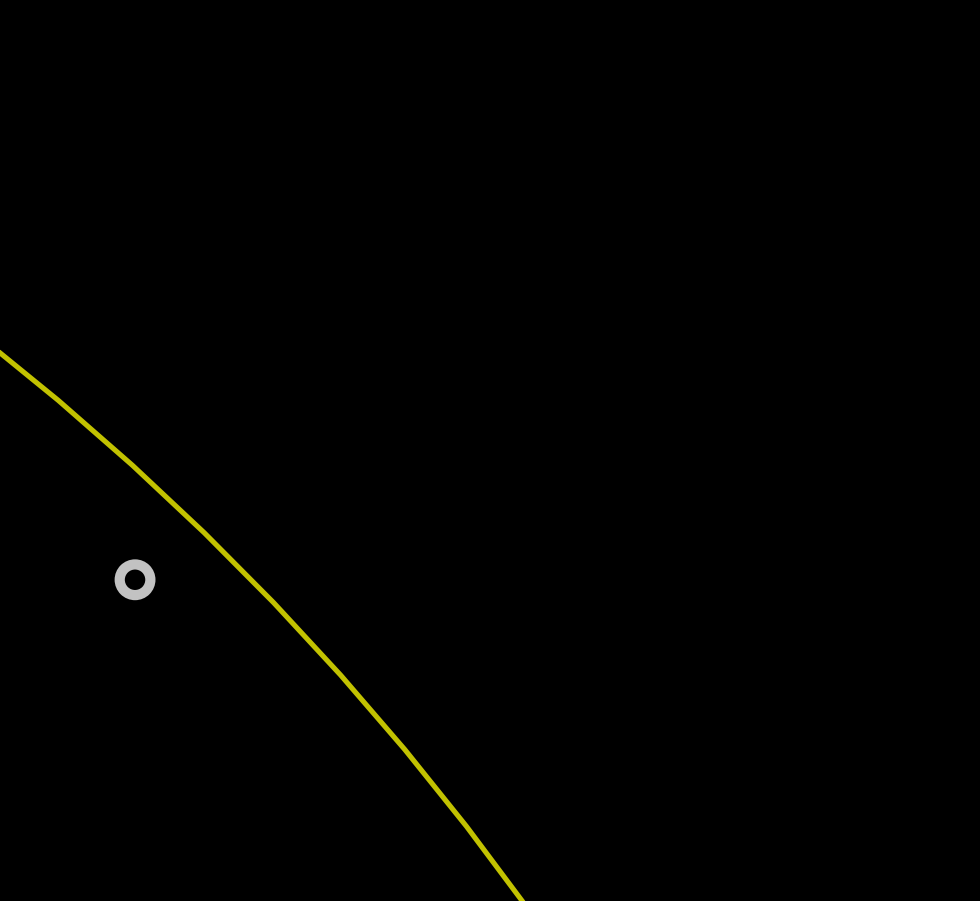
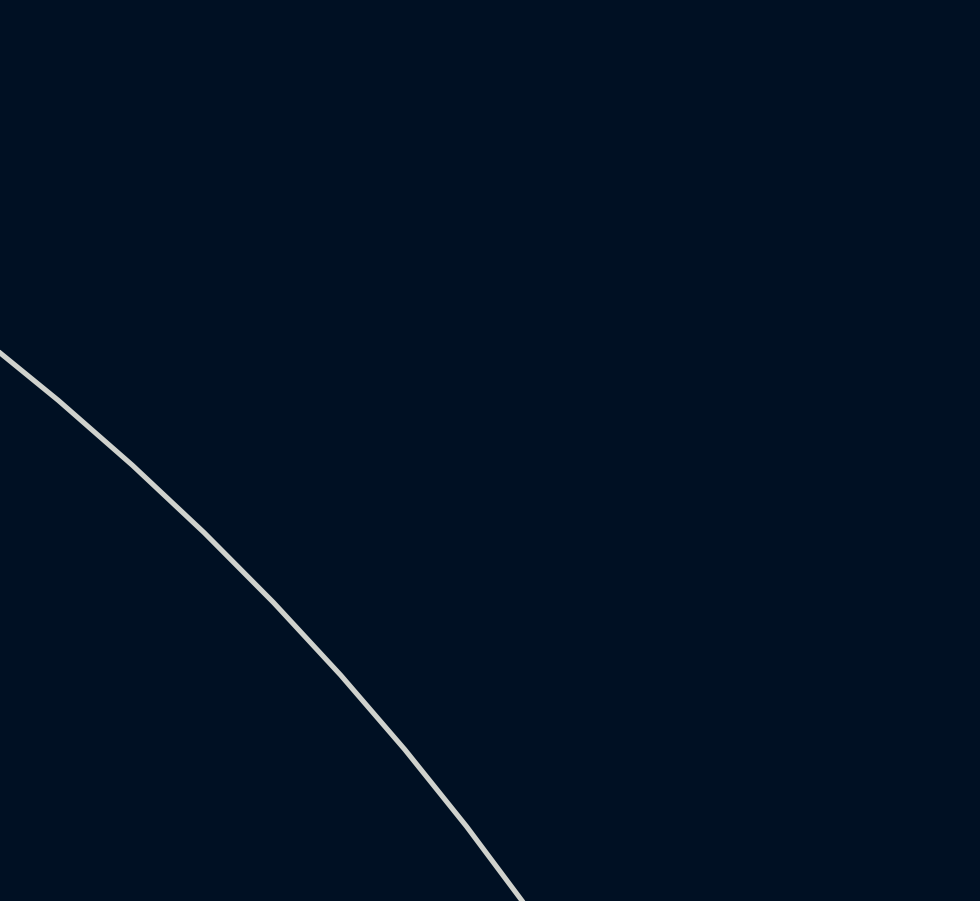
via: (135, 579) -> none

